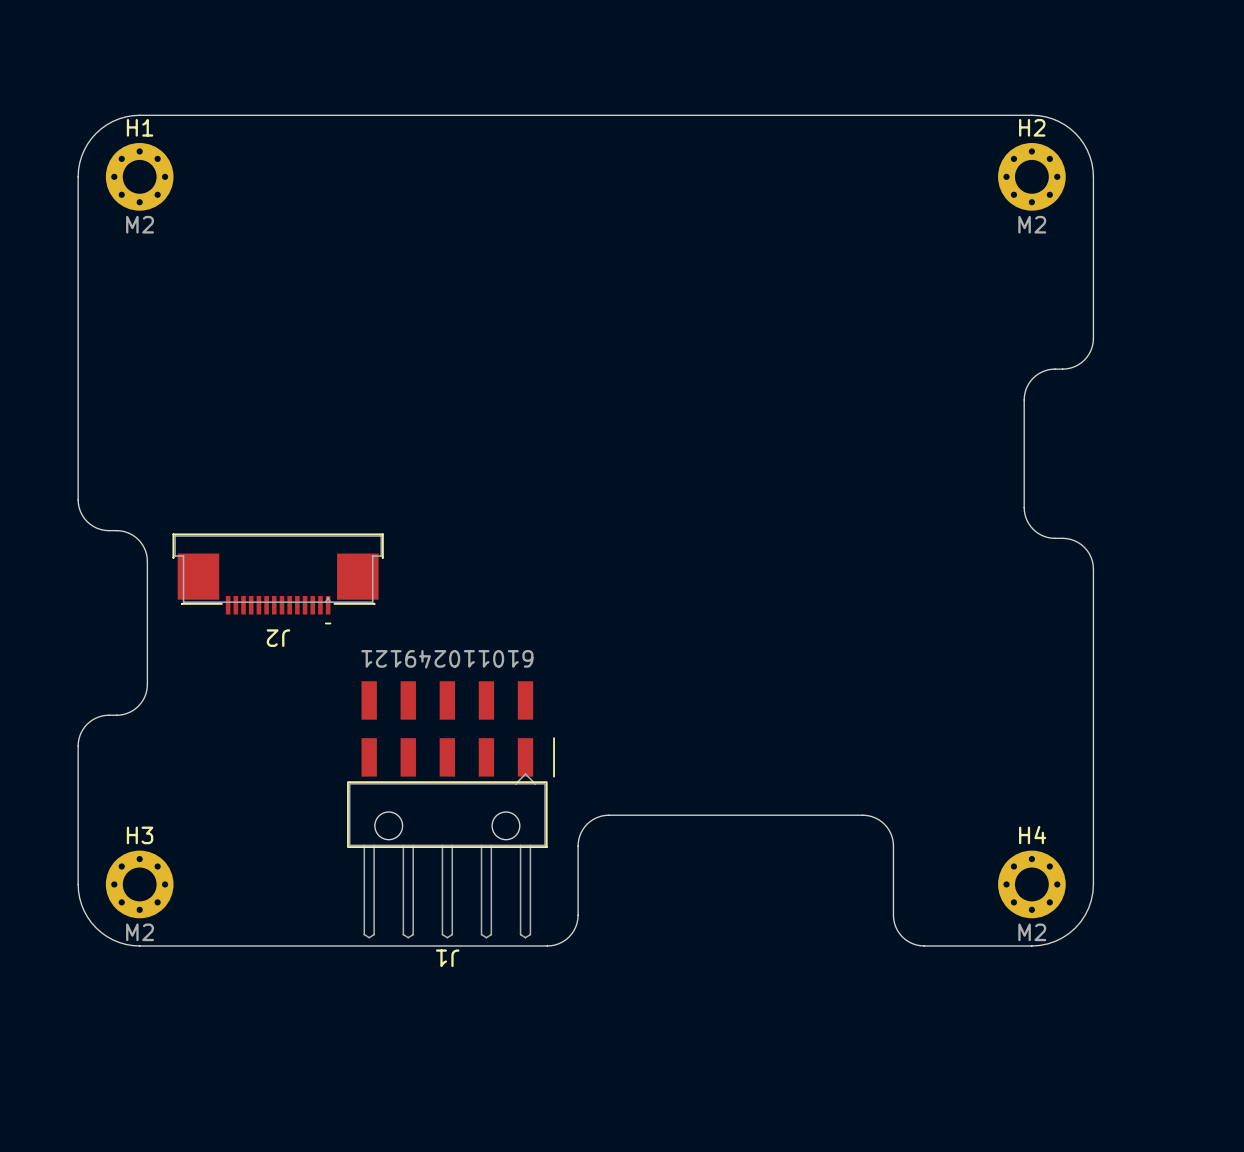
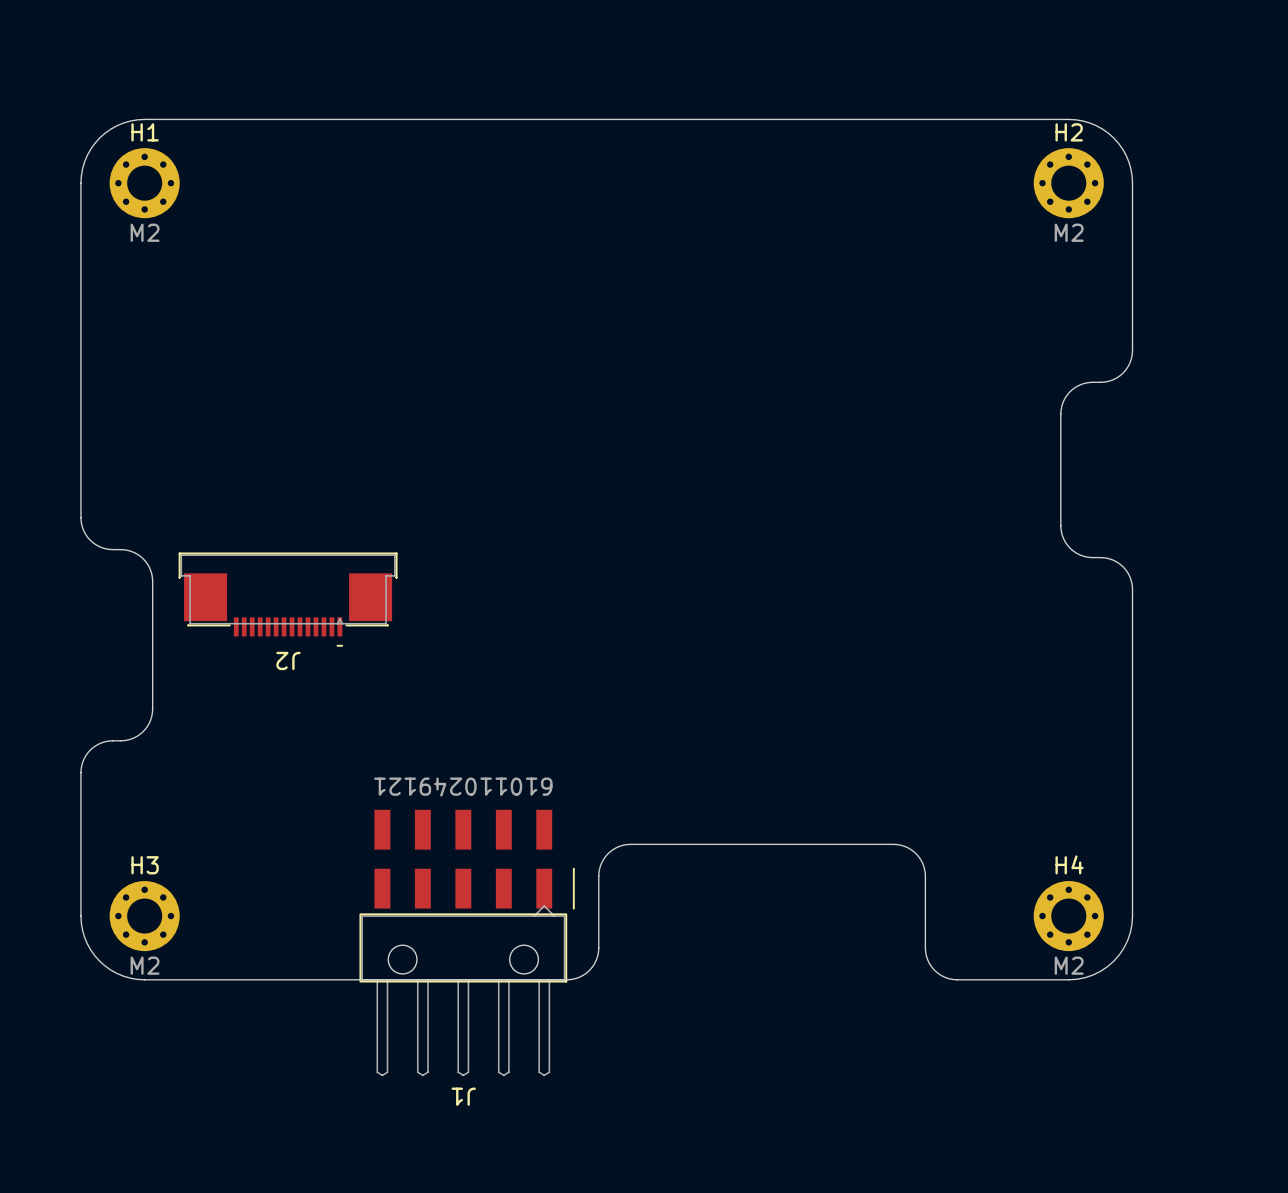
J1 position: (451, 809) -> (467, 942)

